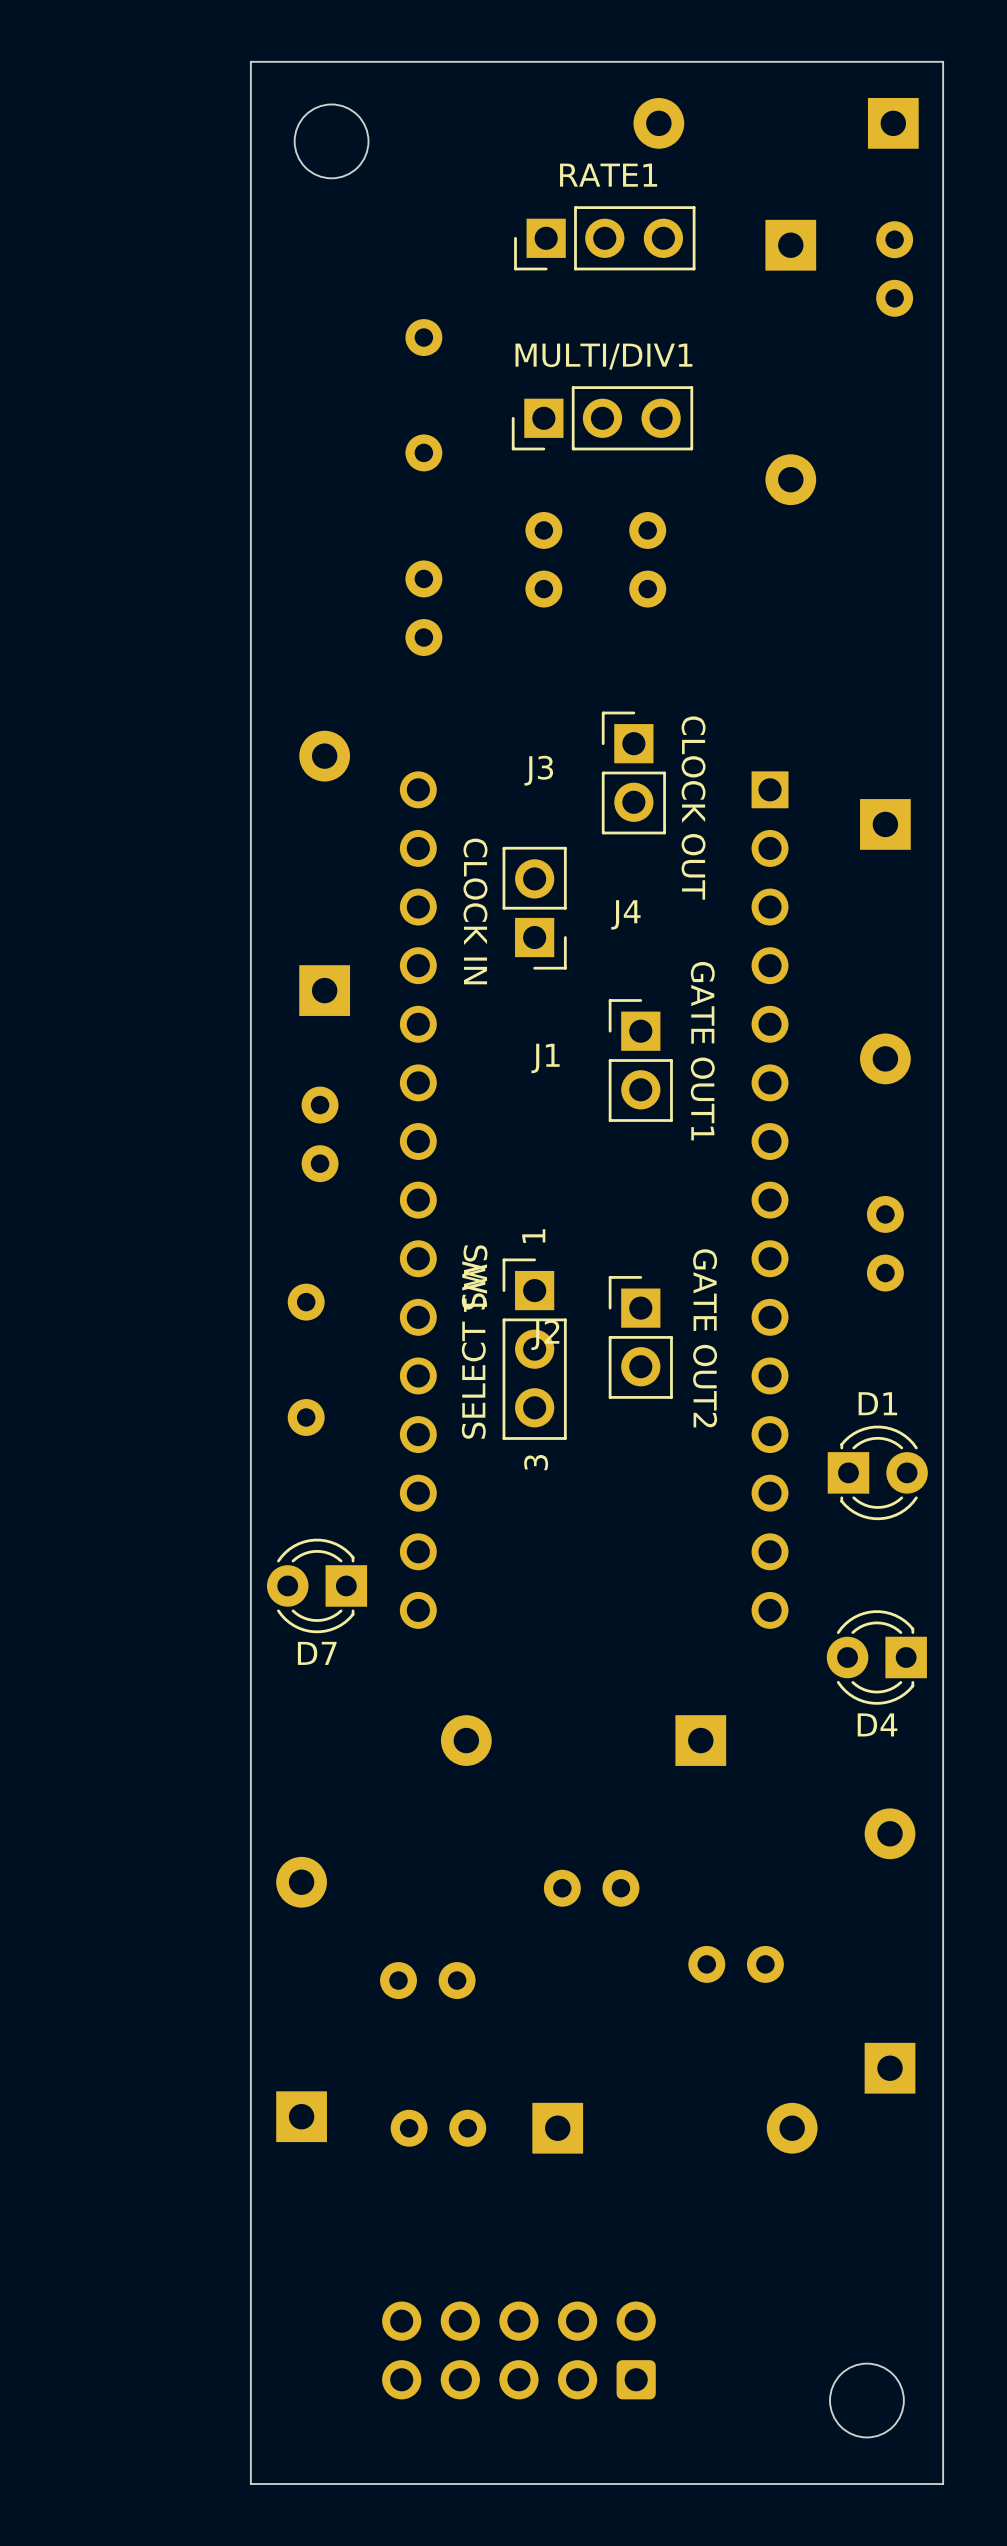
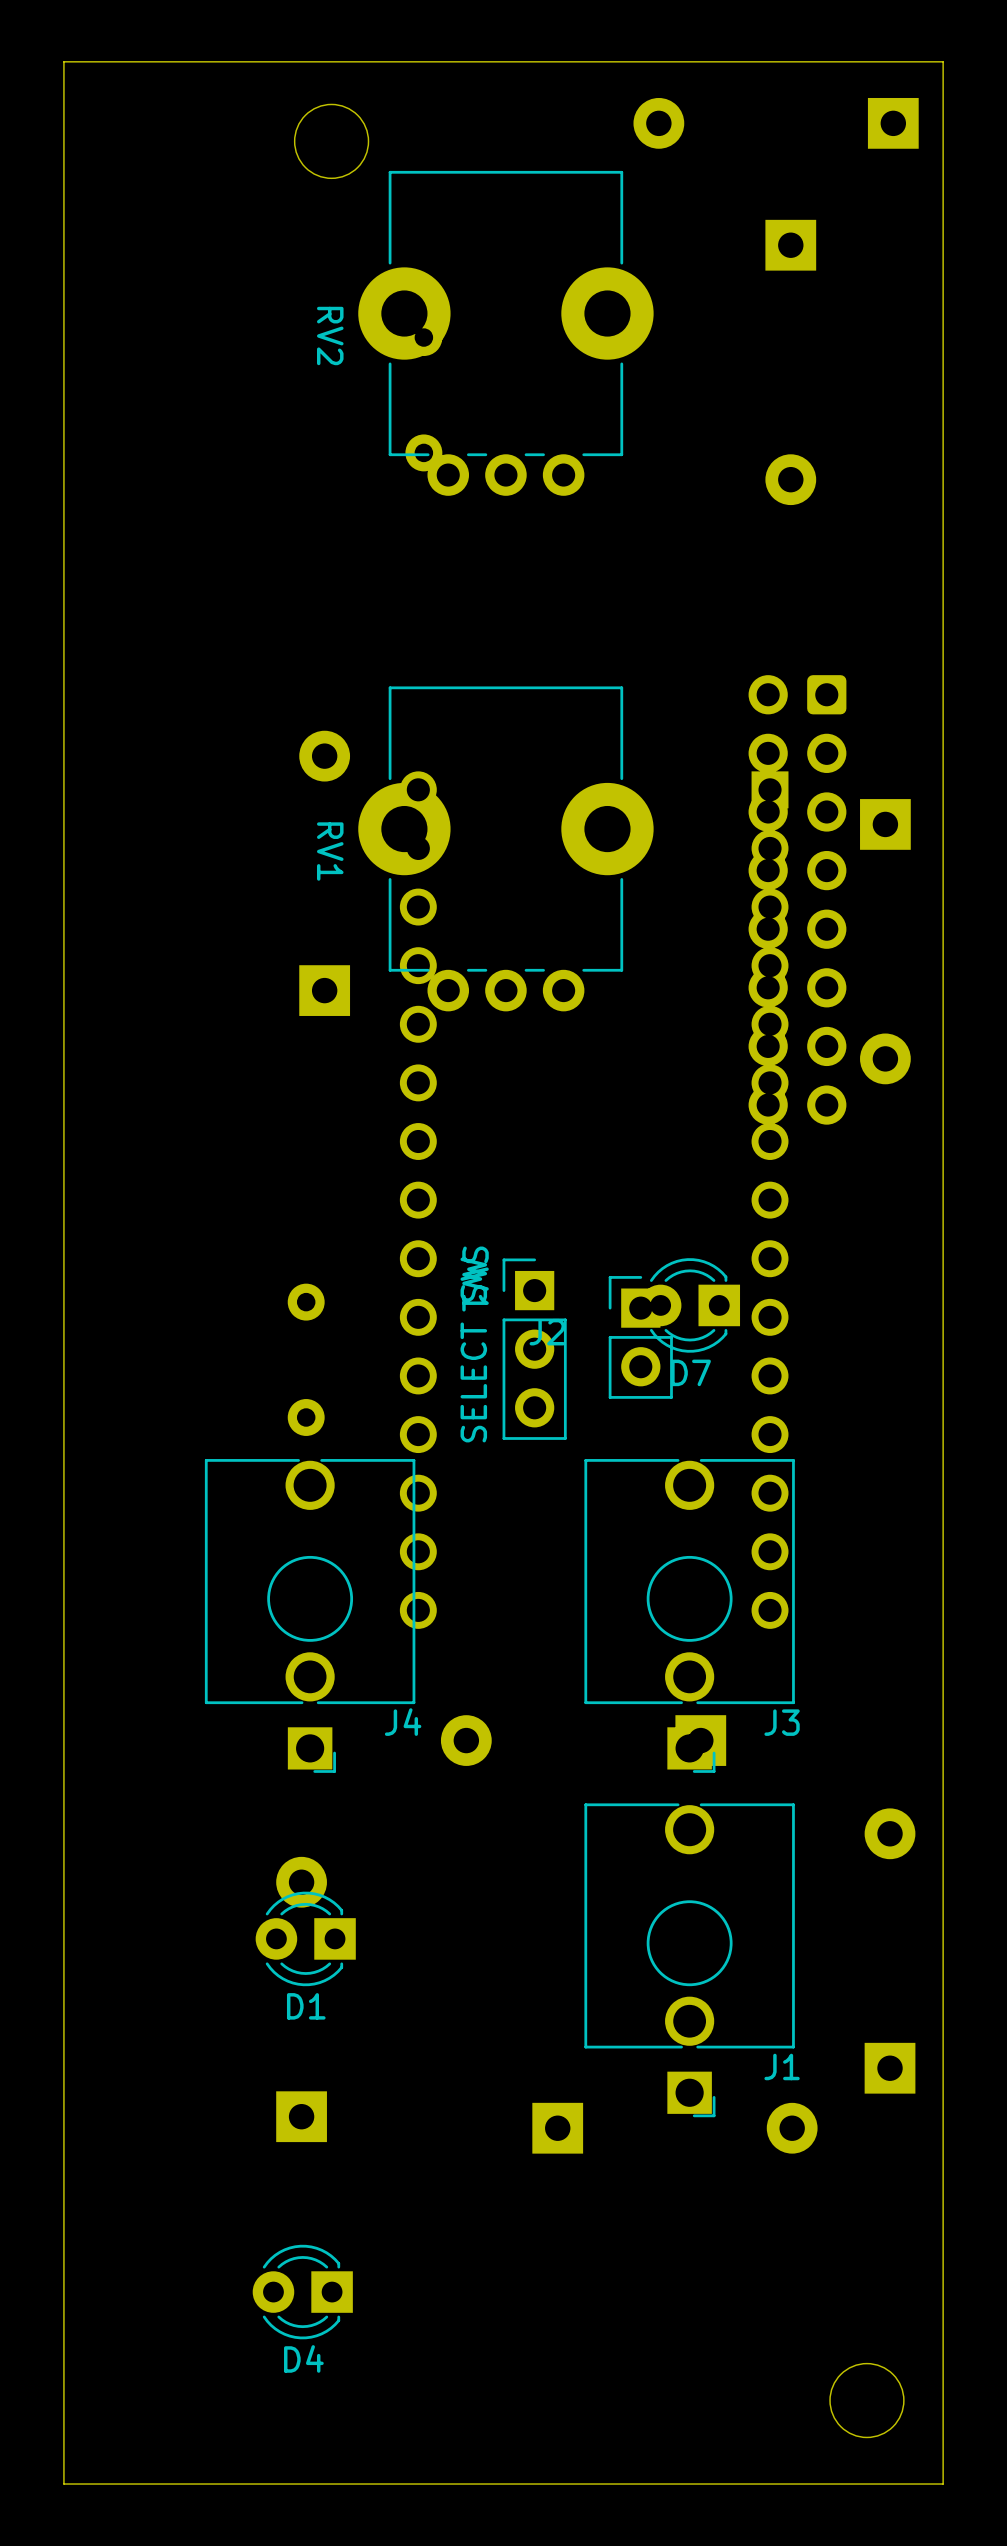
board edge: (250, 61) (250, 2484) -> (250, 61) (63, 61) (63, 2484) (250, 2484)
RATE1: (604, 238) -> none
part: (894, 269) -> none
RV2: none -> (505, 333)
MULTI/DIV1: (602, 418) -> none
part: (543, 559) -> none
part: (647, 559) -> none
part: (423, 608) -> none
J3 footprint: [601, 711, 666, 835] -> [584, 1459, 795, 1773]
J3 name position: J3 (538, 770) -> J3 (782, 1722)
text: CLOCK OUT (693, 808) -> none
J4 footprint: [502, 846, 567, 970] -> [204, 1459, 416, 1773]
RV1: none -> (505, 848)
part: none -> (797, 899)
text: CLOCK IN (475, 911) -> none
J4 name position: J4 (625, 914) -> J4 (403, 1722)
J1 footprint: [608, 999, 673, 1122] -> [584, 1803, 795, 2118]
text: GATE OUT1 (702, 1051) -> none
J1 name position: J1 (545, 1058) -> J1 (782, 2066)
part: (320, 1134) -> none
text: 1 (533, 1236) -> none
part: (885, 1243) -> none
text: GATE OUT2 (705, 1338) -> none
text: 3 (536, 1462) -> none
D1 rotation: 0° (877, 1472) -> 180° (305, 1938)
D1 position: (877, 1472) -> (305, 1938)
D7 position: (317, 1585) -> (689, 1305)
D4 footprint: [826, 1610, 927, 1705] -> [252, 2244, 353, 2340]
part: (591, 1888) -> none
part: (736, 1964) -> none
part: (427, 1980) -> none
part: (438, 2128) -> none
part: (518, 2350) -> none

